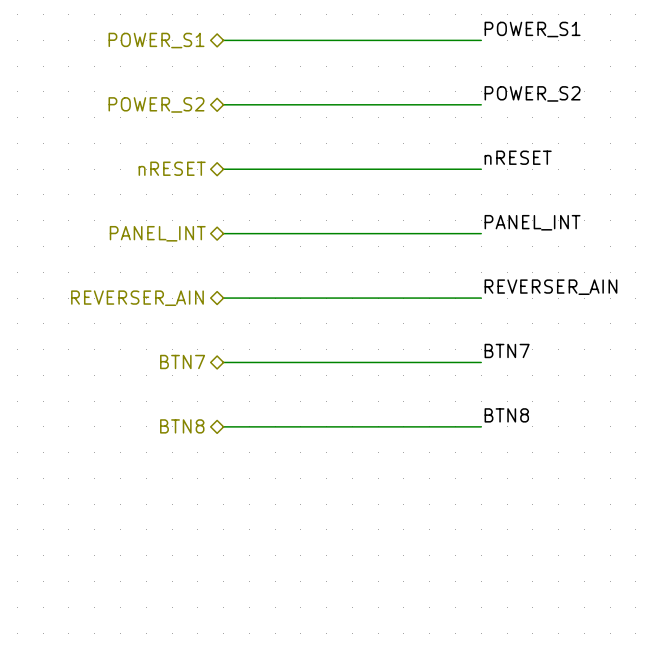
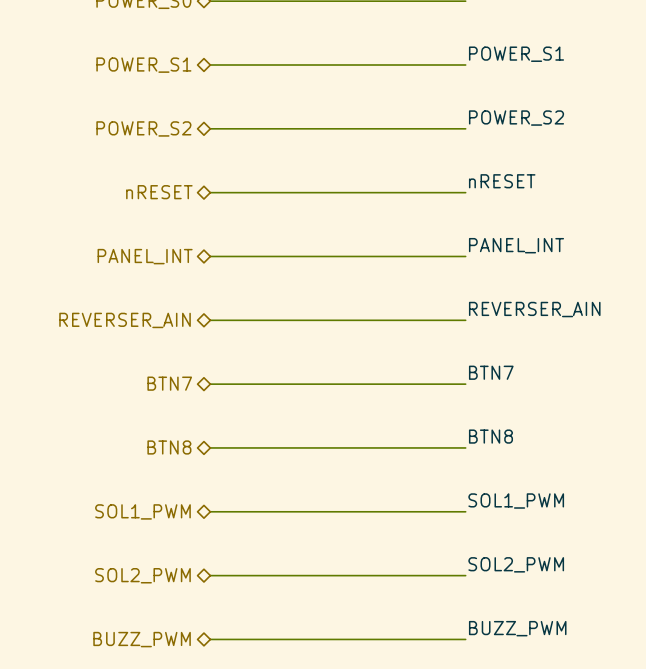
label: none -> SOL1_PWM (516, 501)
hierarchical label: none -> SOL1_PWM (142, 511)
wire: none -> (210, 511) (465, 511)
label: none -> SOL2_PWM (516, 564)
hierarchical label: none -> SOL2_PWM (142, 575)
wire: none -> (210, 575) (465, 575)
label: none -> BUZZ_PWM (517, 628)
hierarchical label: none -> BUZZ_PWM (142, 639)
wire: none -> (210, 639) (465, 639)

